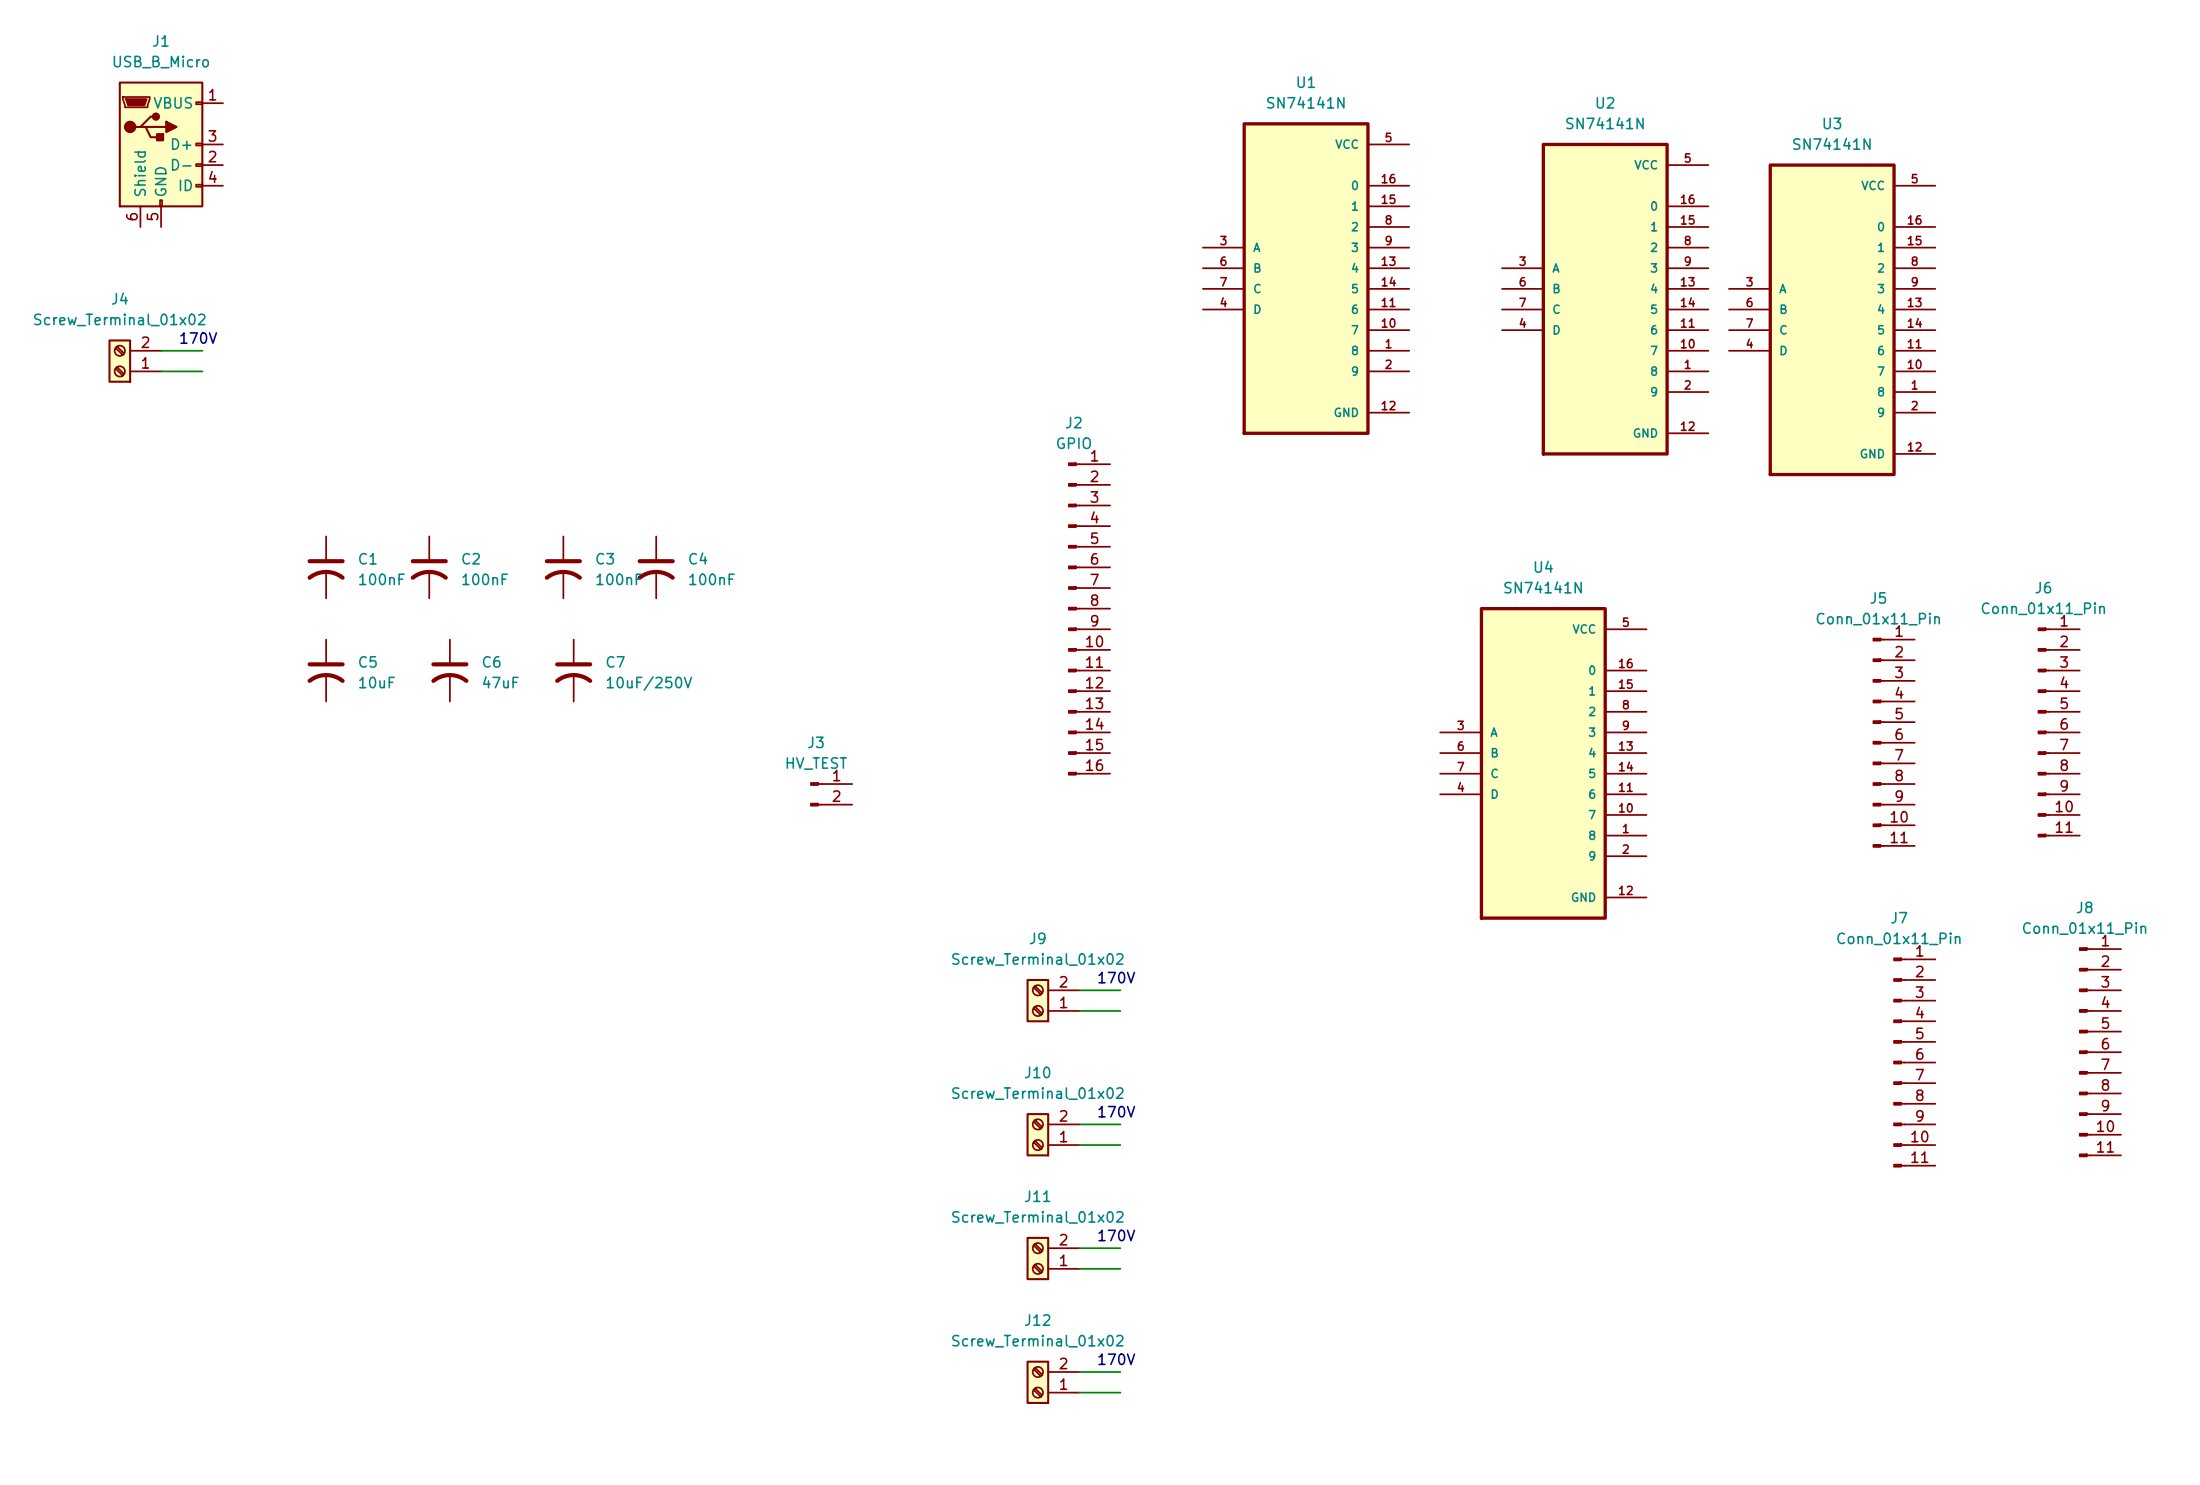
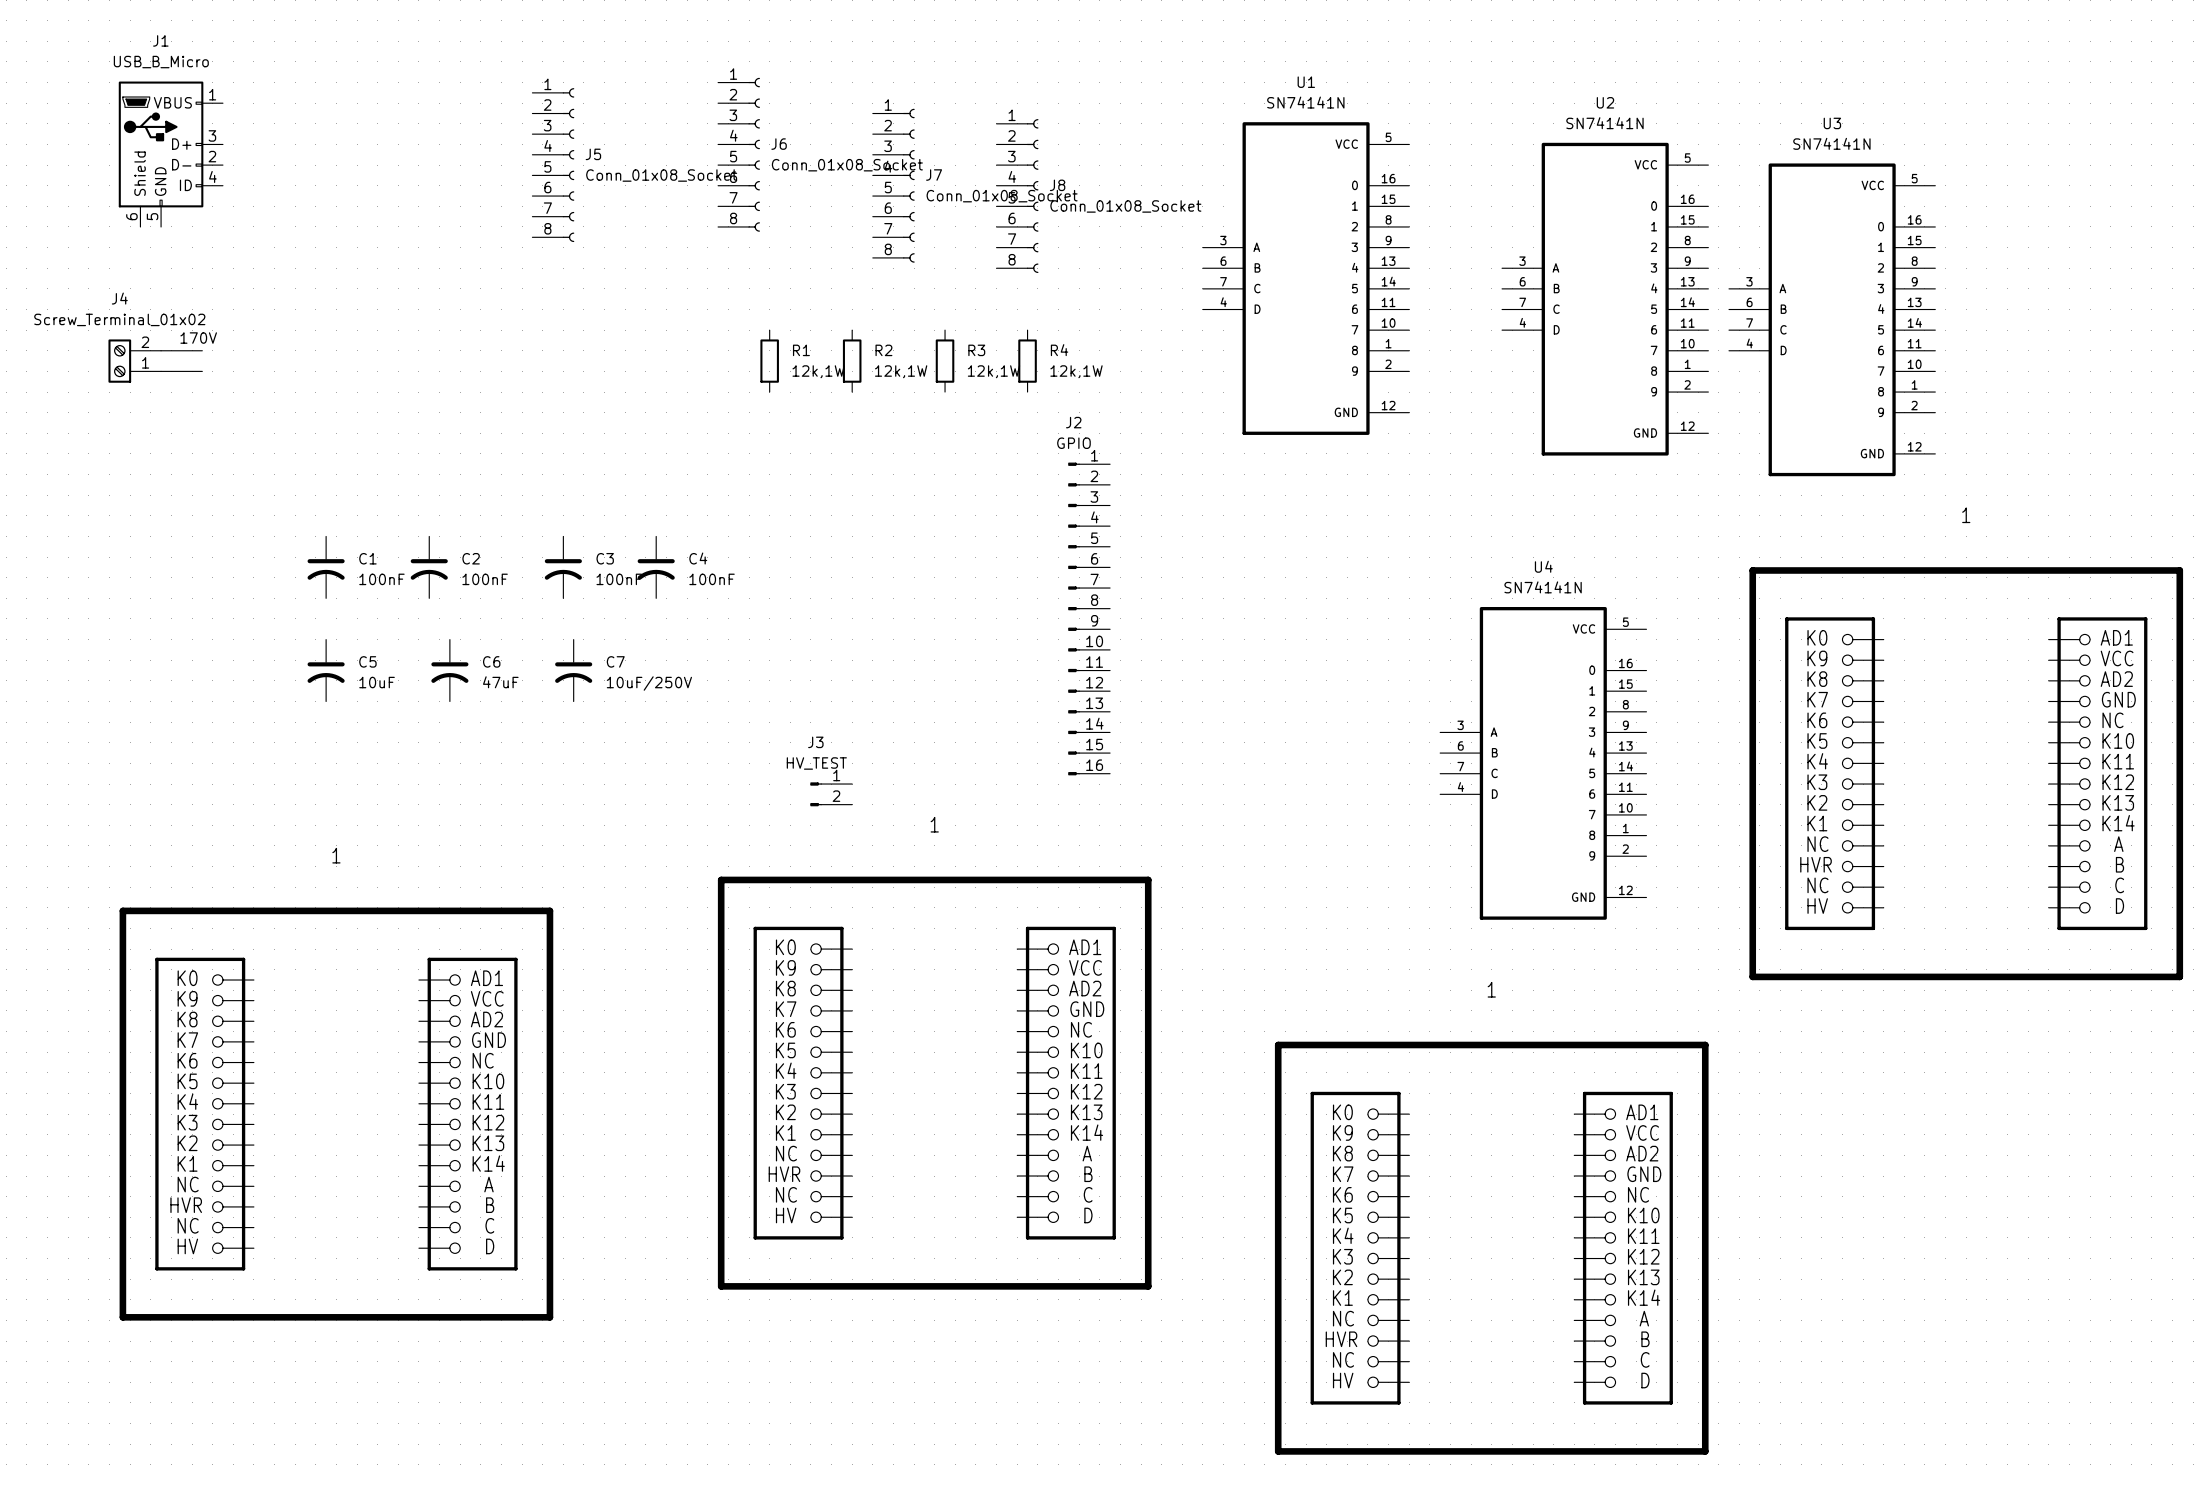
R1: none -> 12k,1W (769, 361)
R2: none -> 12k,1W (852, 361)
R3: none -> 12k,1W (945, 361)
R4: none -> 12k,1W (1027, 361)
J6 name position: J6 (2043, 587) -> J6 (779, 144)
J5 name position: J5 (1878, 597) -> J5 (593, 154)
J6 value: Conn_01x11_Pin (2043, 608) -> Conn_01x08_Socket (847, 165)
J5 value: Conn_01x11_Pin (1878, 619) -> Conn_01x08_Socket (661, 175)
J6 symbol: [2037, 627, 2080, 838] -> [718, 77, 760, 232]
J5 symbol: [1872, 637, 1915, 848] -> [532, 88, 575, 243]
1: none -> (1966, 773)
J8 name position: J8 (2084, 907) -> J8 (1057, 185)
J7 name position: J7 (1899, 917) -> J7 (934, 175)
J8 value: Conn_01x11_Pin (2084, 928) -> Conn_01x08_Socket (1125, 206)
J7 value: Conn_01x11_Pin (1898, 938) -> Conn_01x08_Socket (1002, 196)
J8 symbol: [2079, 947, 2121, 1158] -> [996, 119, 1039, 273]
J7 symbol: [1893, 957, 1936, 1168] -> [872, 108, 915, 263]
text: 170V (1116, 977) -> none
wire: (1079, 990) (1120, 990) -> none
J9: Screw_Terminal_01x02 (1052, 1000) -> none
wire: (1079, 1010) (1120, 1010) -> none
1: none -> (934, 1083)
text: 170V (1116, 1111) -> none
1: none -> (336, 1114)
wire: (1079, 1124) (1120, 1124) -> none
J10: Screw_Terminal_01x02 (1052, 1134) -> none
wire: (1079, 1145) (1120, 1145) -> none
text: 170V (1116, 1235) -> none
wire: (1079, 1248) (1120, 1248) -> none
1: none -> (1491, 1248)
J11: Screw_Terminal_01x02 (1052, 1258) -> none
wire: (1079, 1268) (1120, 1268) -> none
text: 170V (1116, 1359) -> none
wire: (1079, 1371) (1120, 1371) -> none
J12: Screw_Terminal_01x02 (1052, 1382) -> none
wire: (1079, 1392) (1120, 1392) -> none

